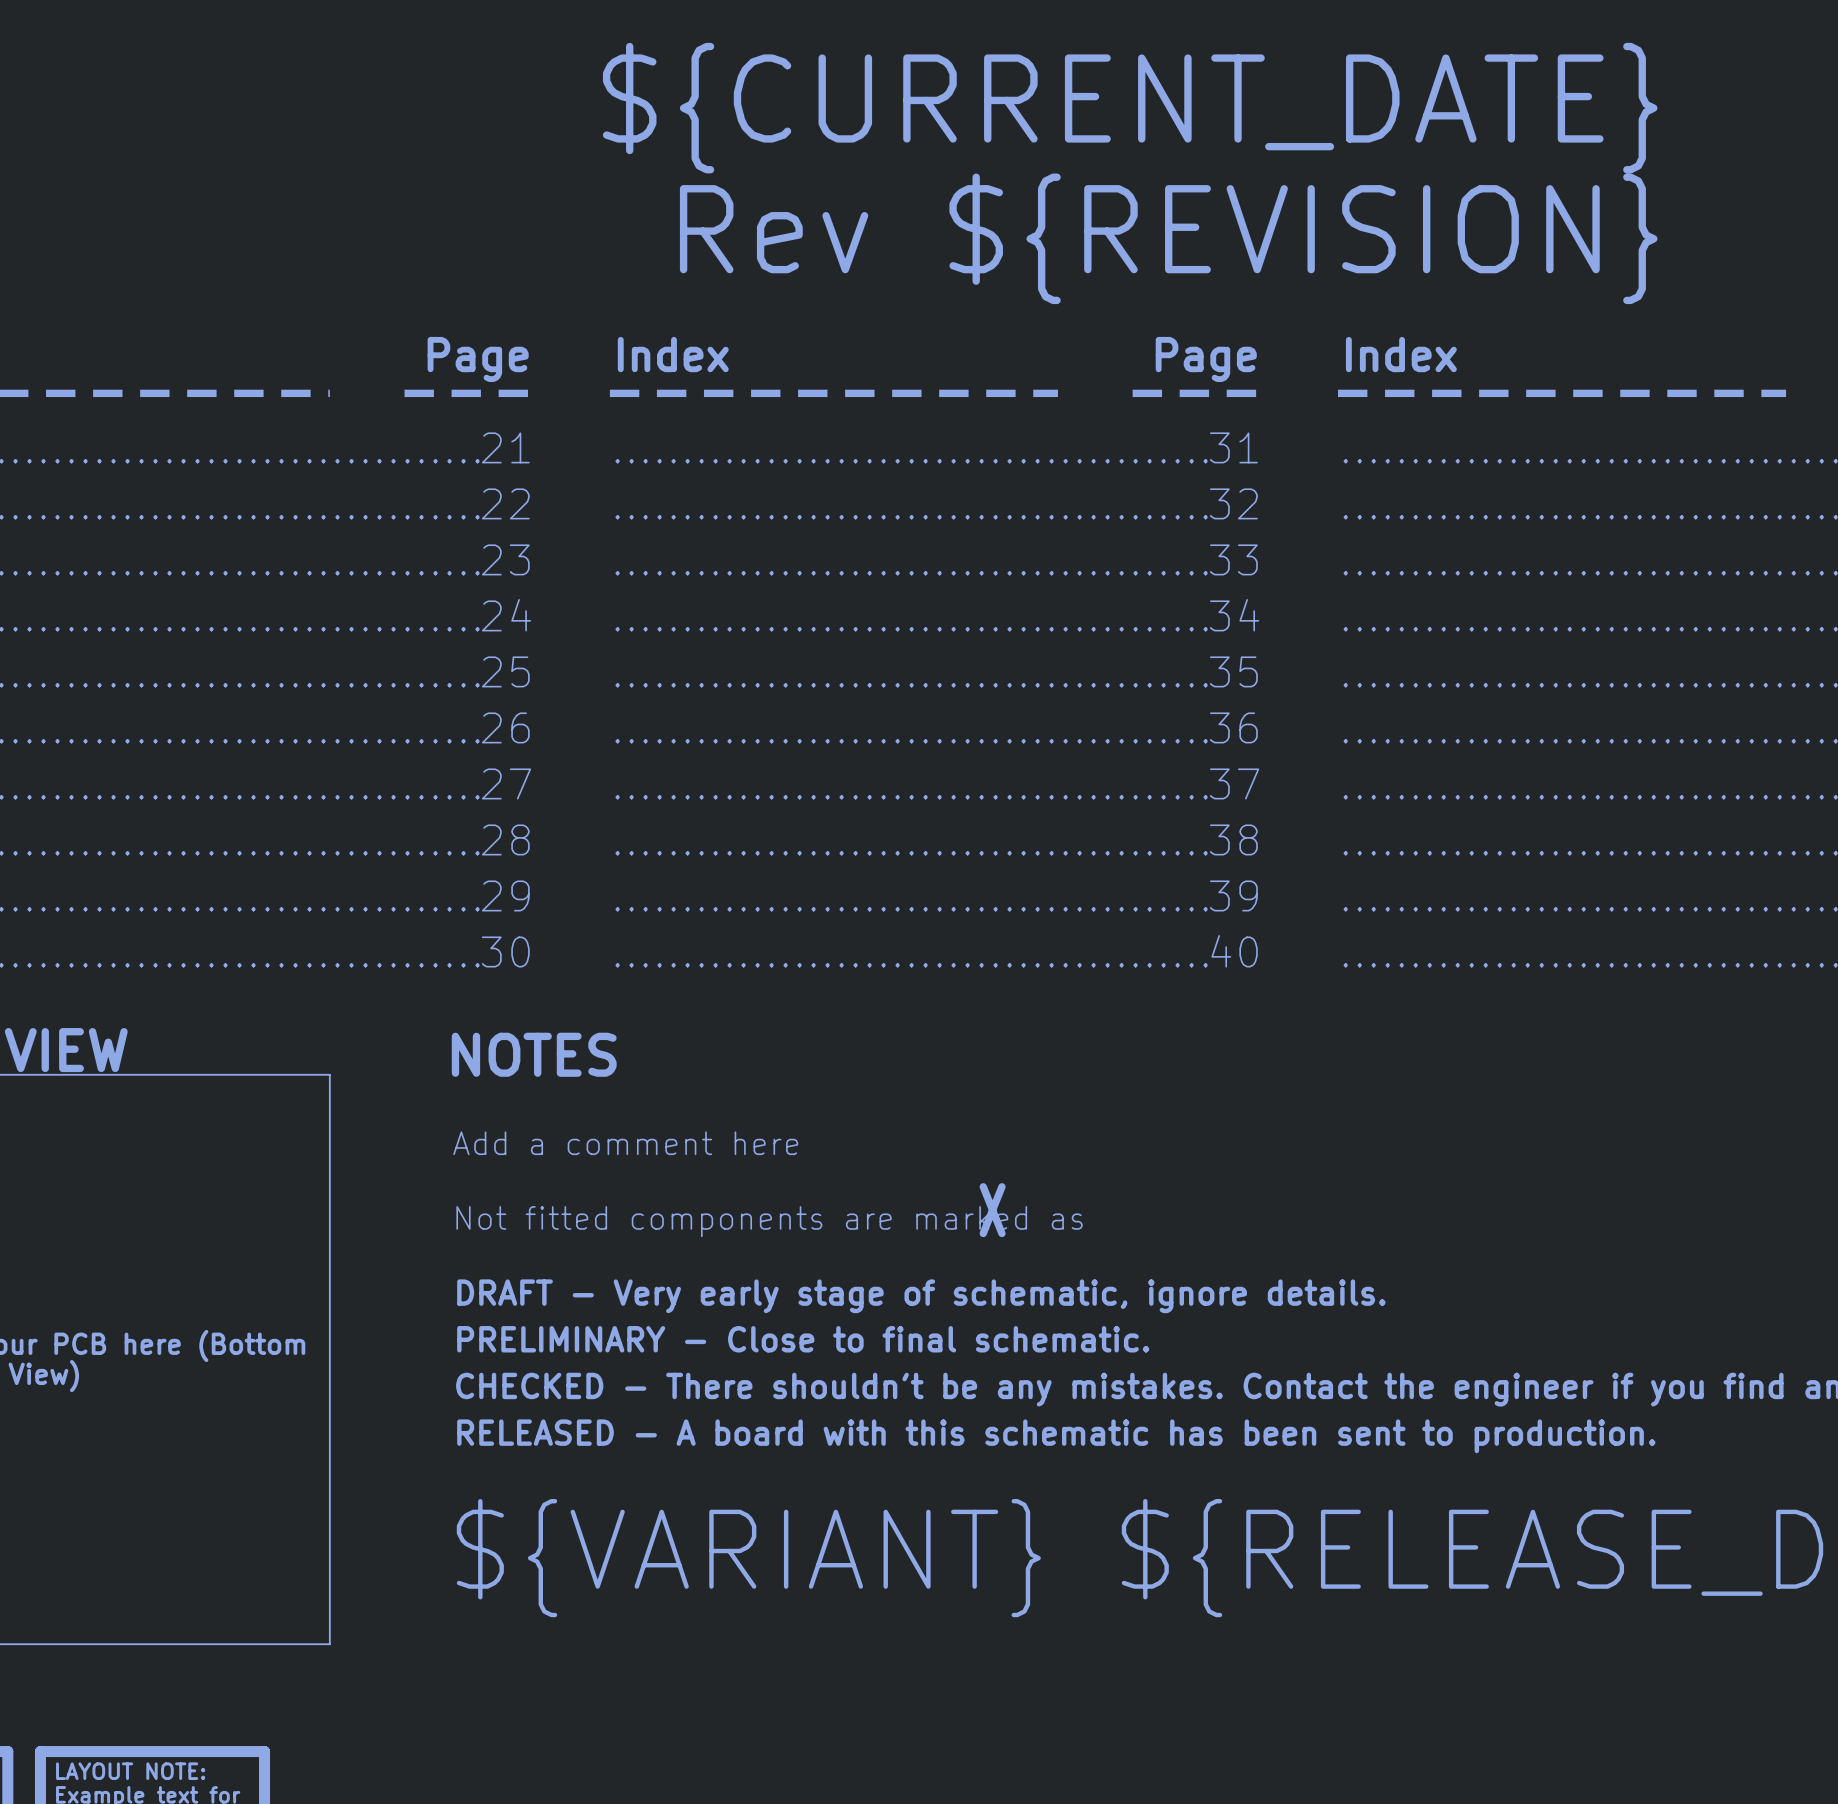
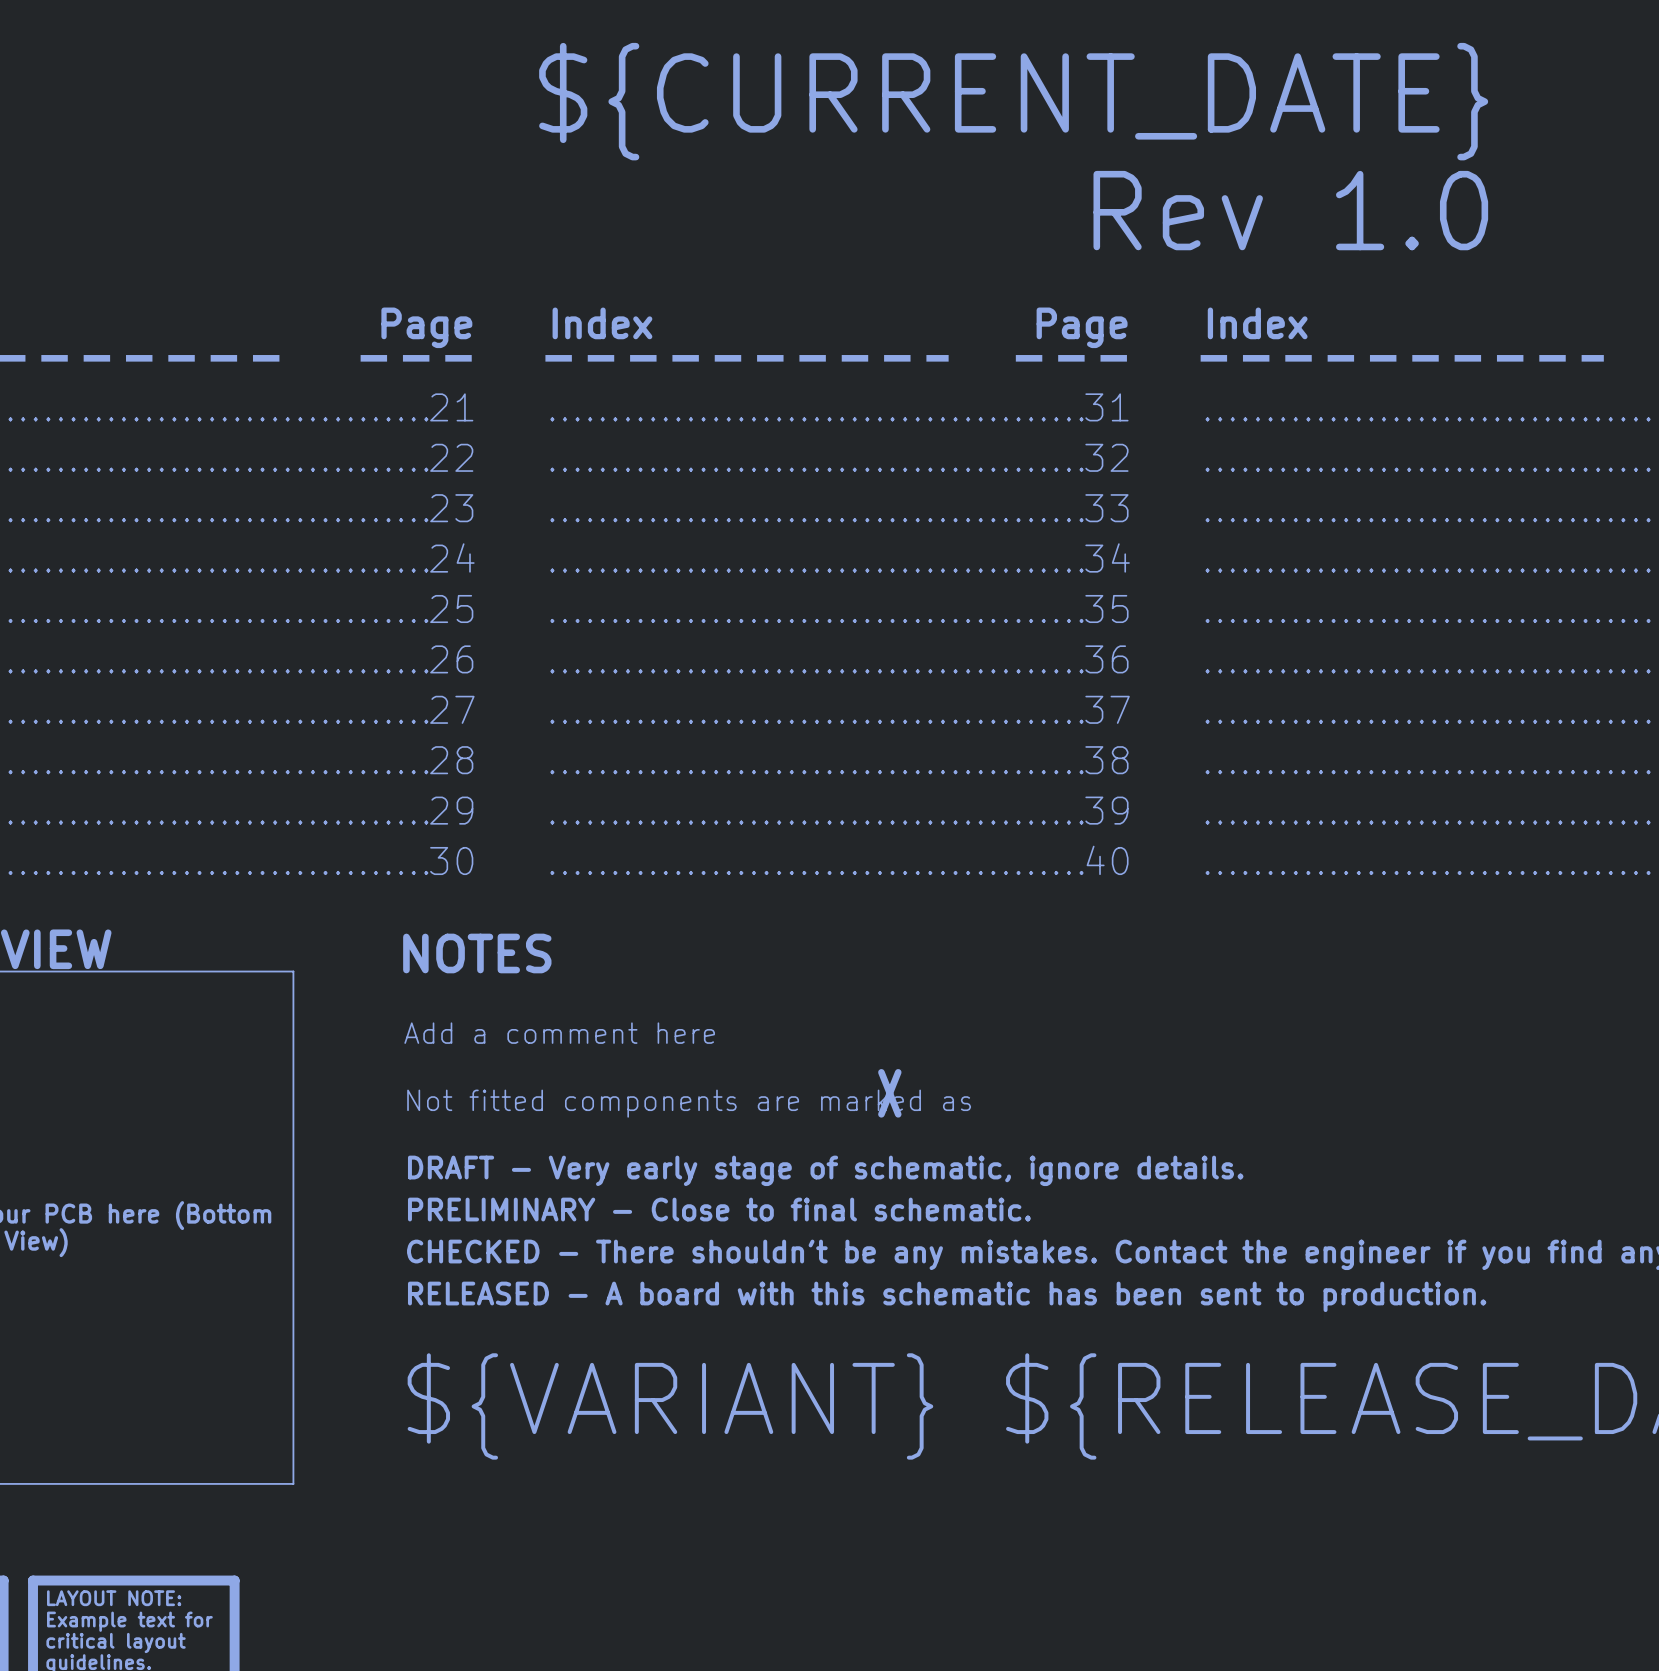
text: Rev ${REVISION} (1168, 238) -> Rev 1.0 (1290, 210)

